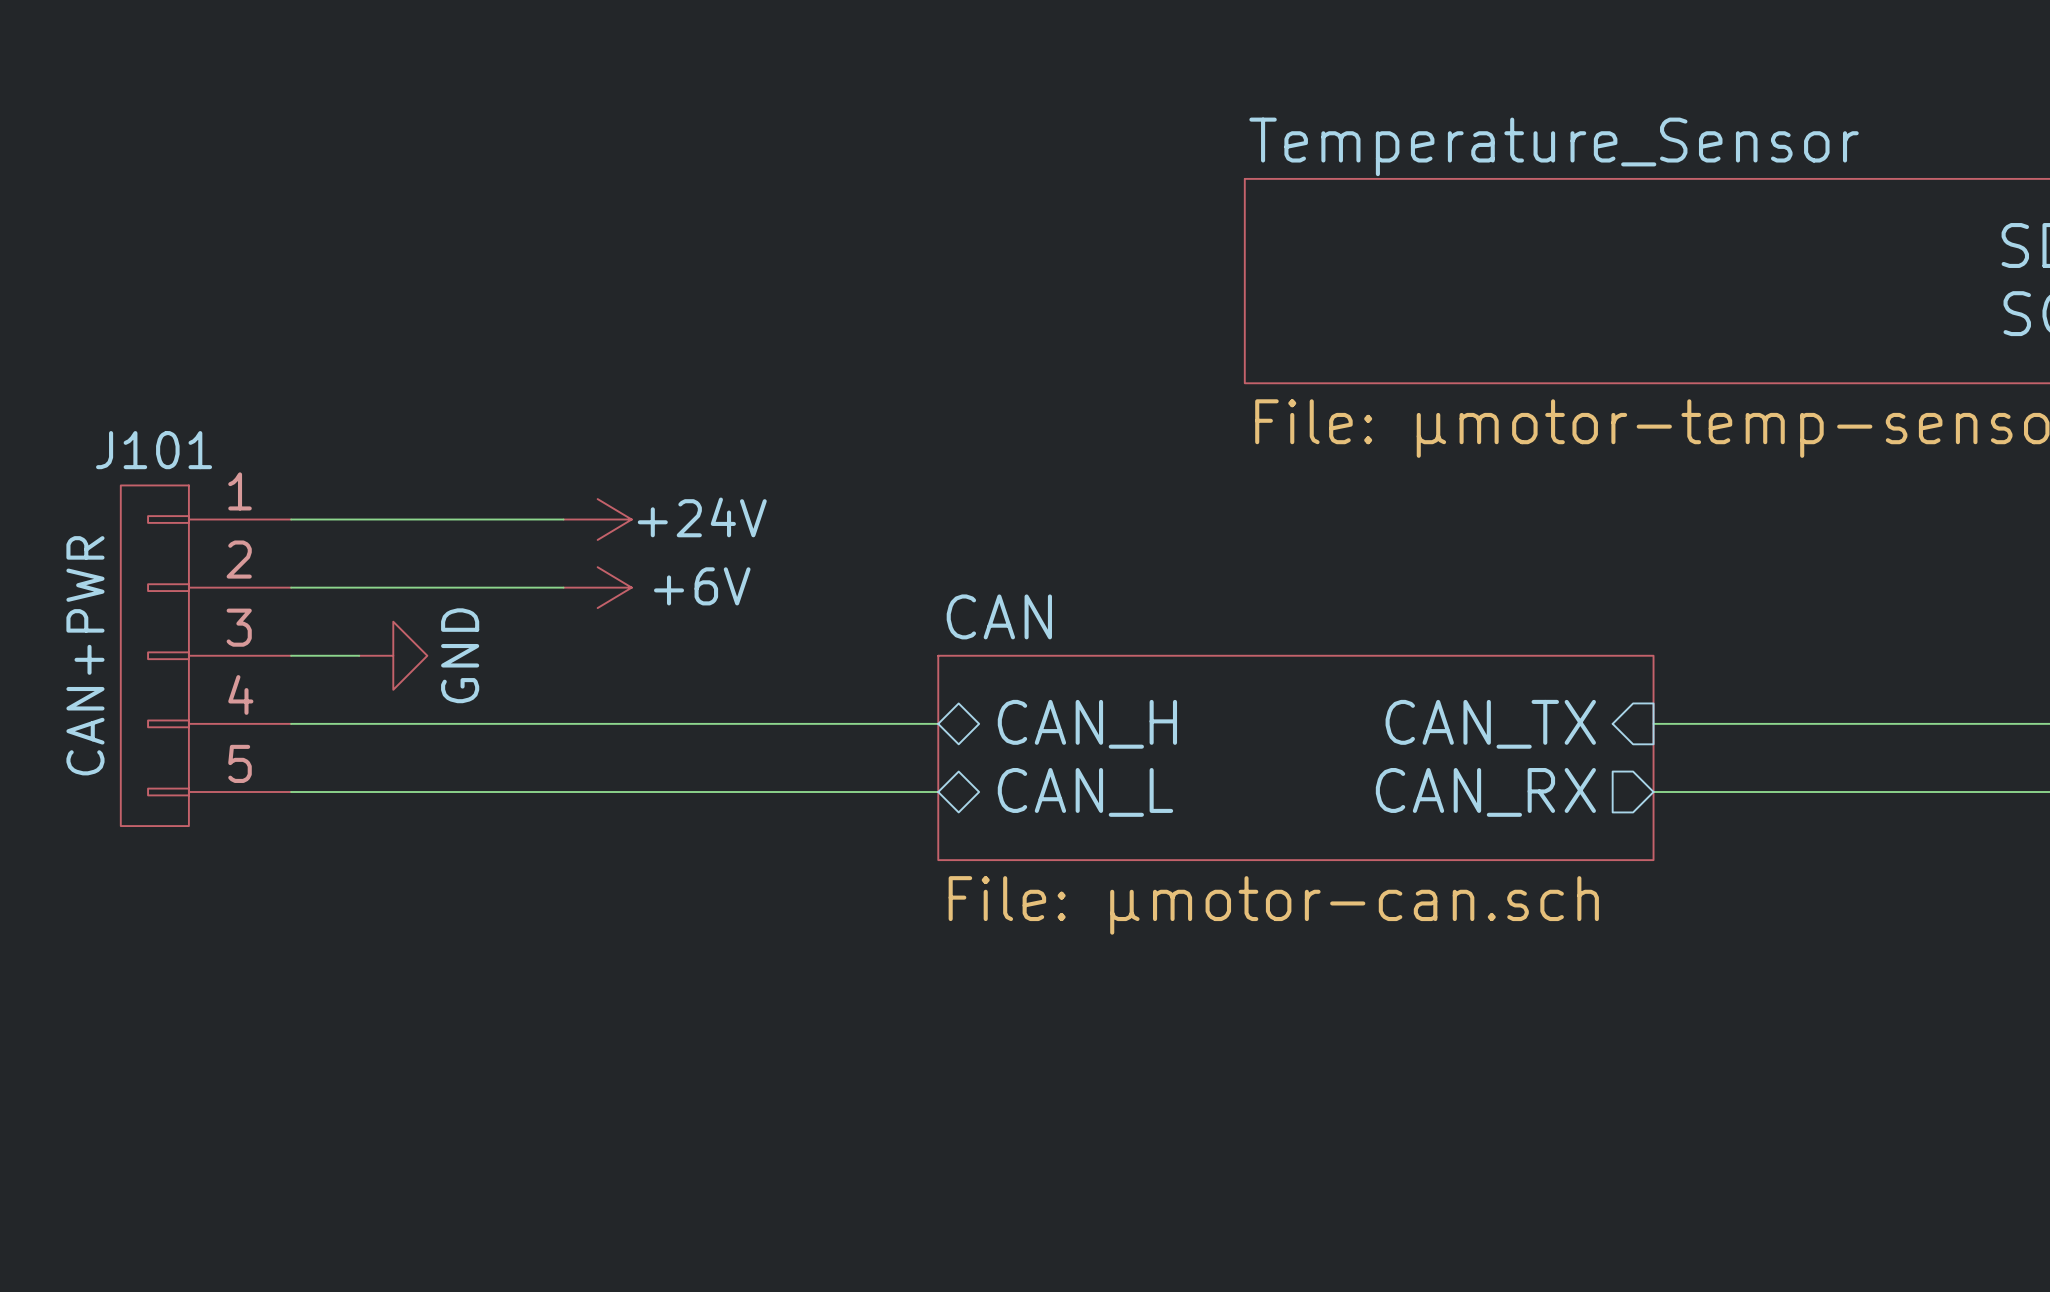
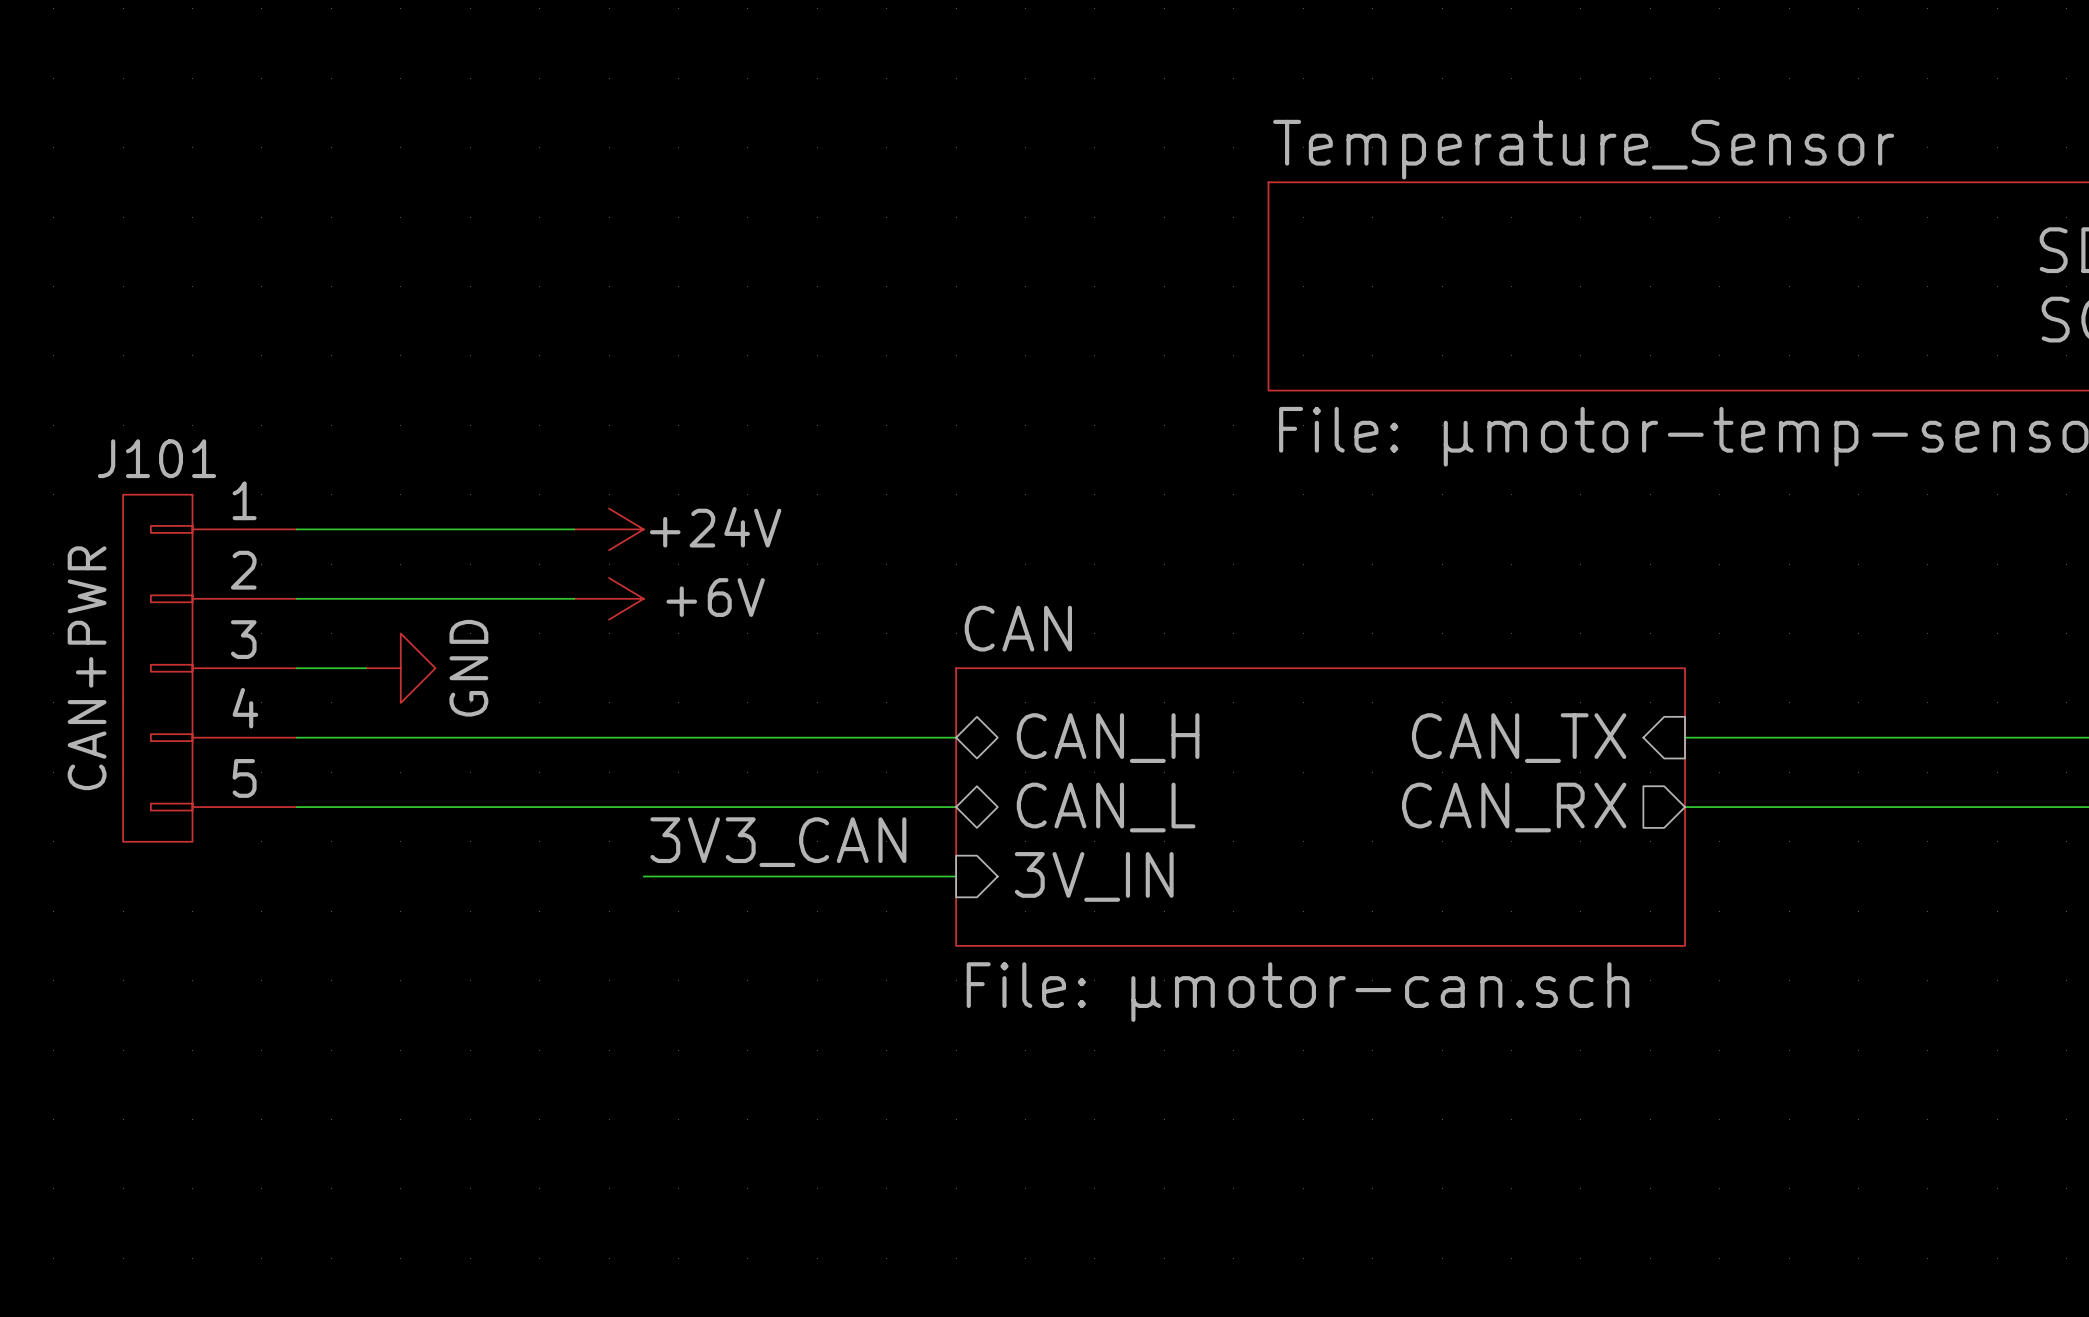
sheet CAN: File: µmotor-can.sch (1295, 757) -> none
sheet CAN: none -> File: µmotor-can.sch (1320, 807)
label: none -> 3V3_CAN (778, 842)
wire: none -> (643, 876) (956, 876)
sheet pin: none -> 3V_IN (1094, 876)

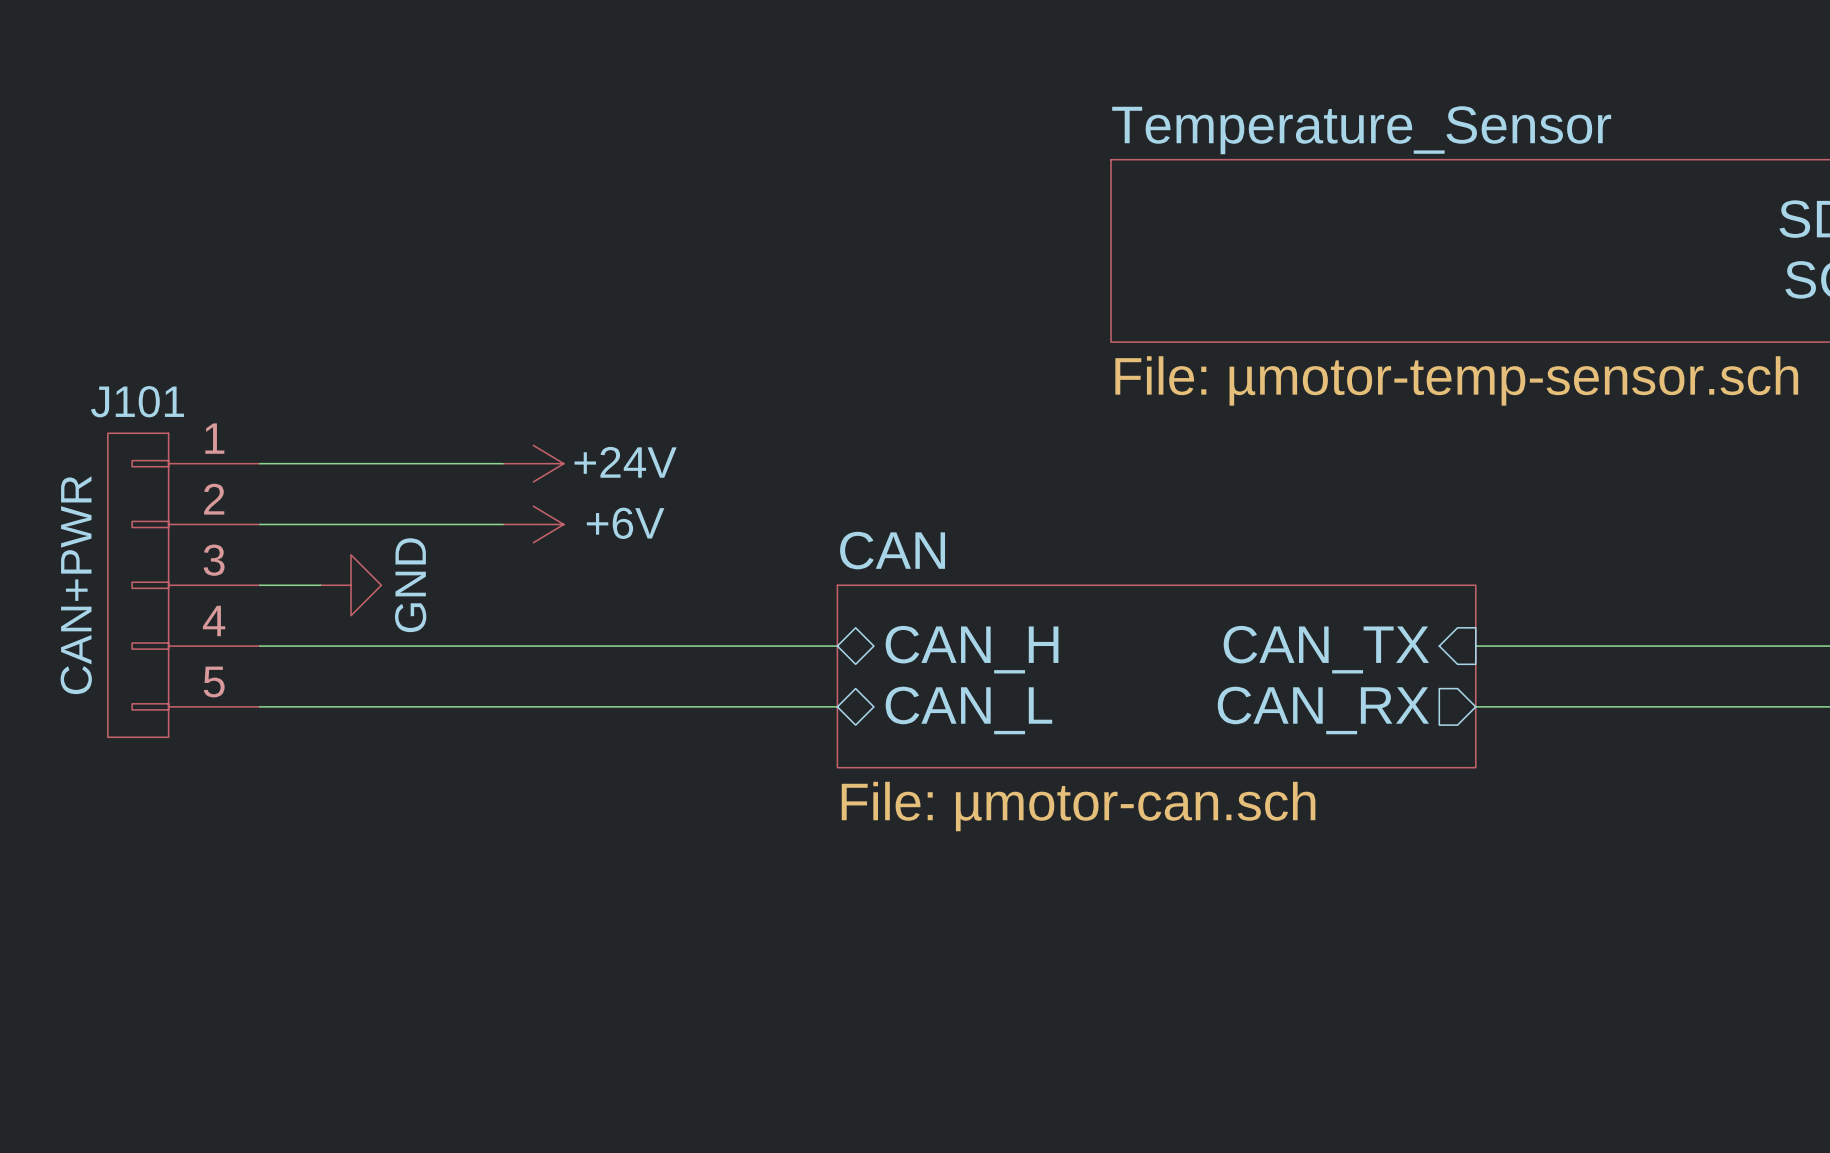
sheet CAN: none -> File: µmotor-can.sch (1156, 676)
sheet CAN: File: µmotor-can.sch (1320, 807) -> none
label: 3V3_CAN (778, 842) -> none
wire: (643, 876) (956, 876) -> none
sheet pin: 3V_IN (1094, 876) -> none

